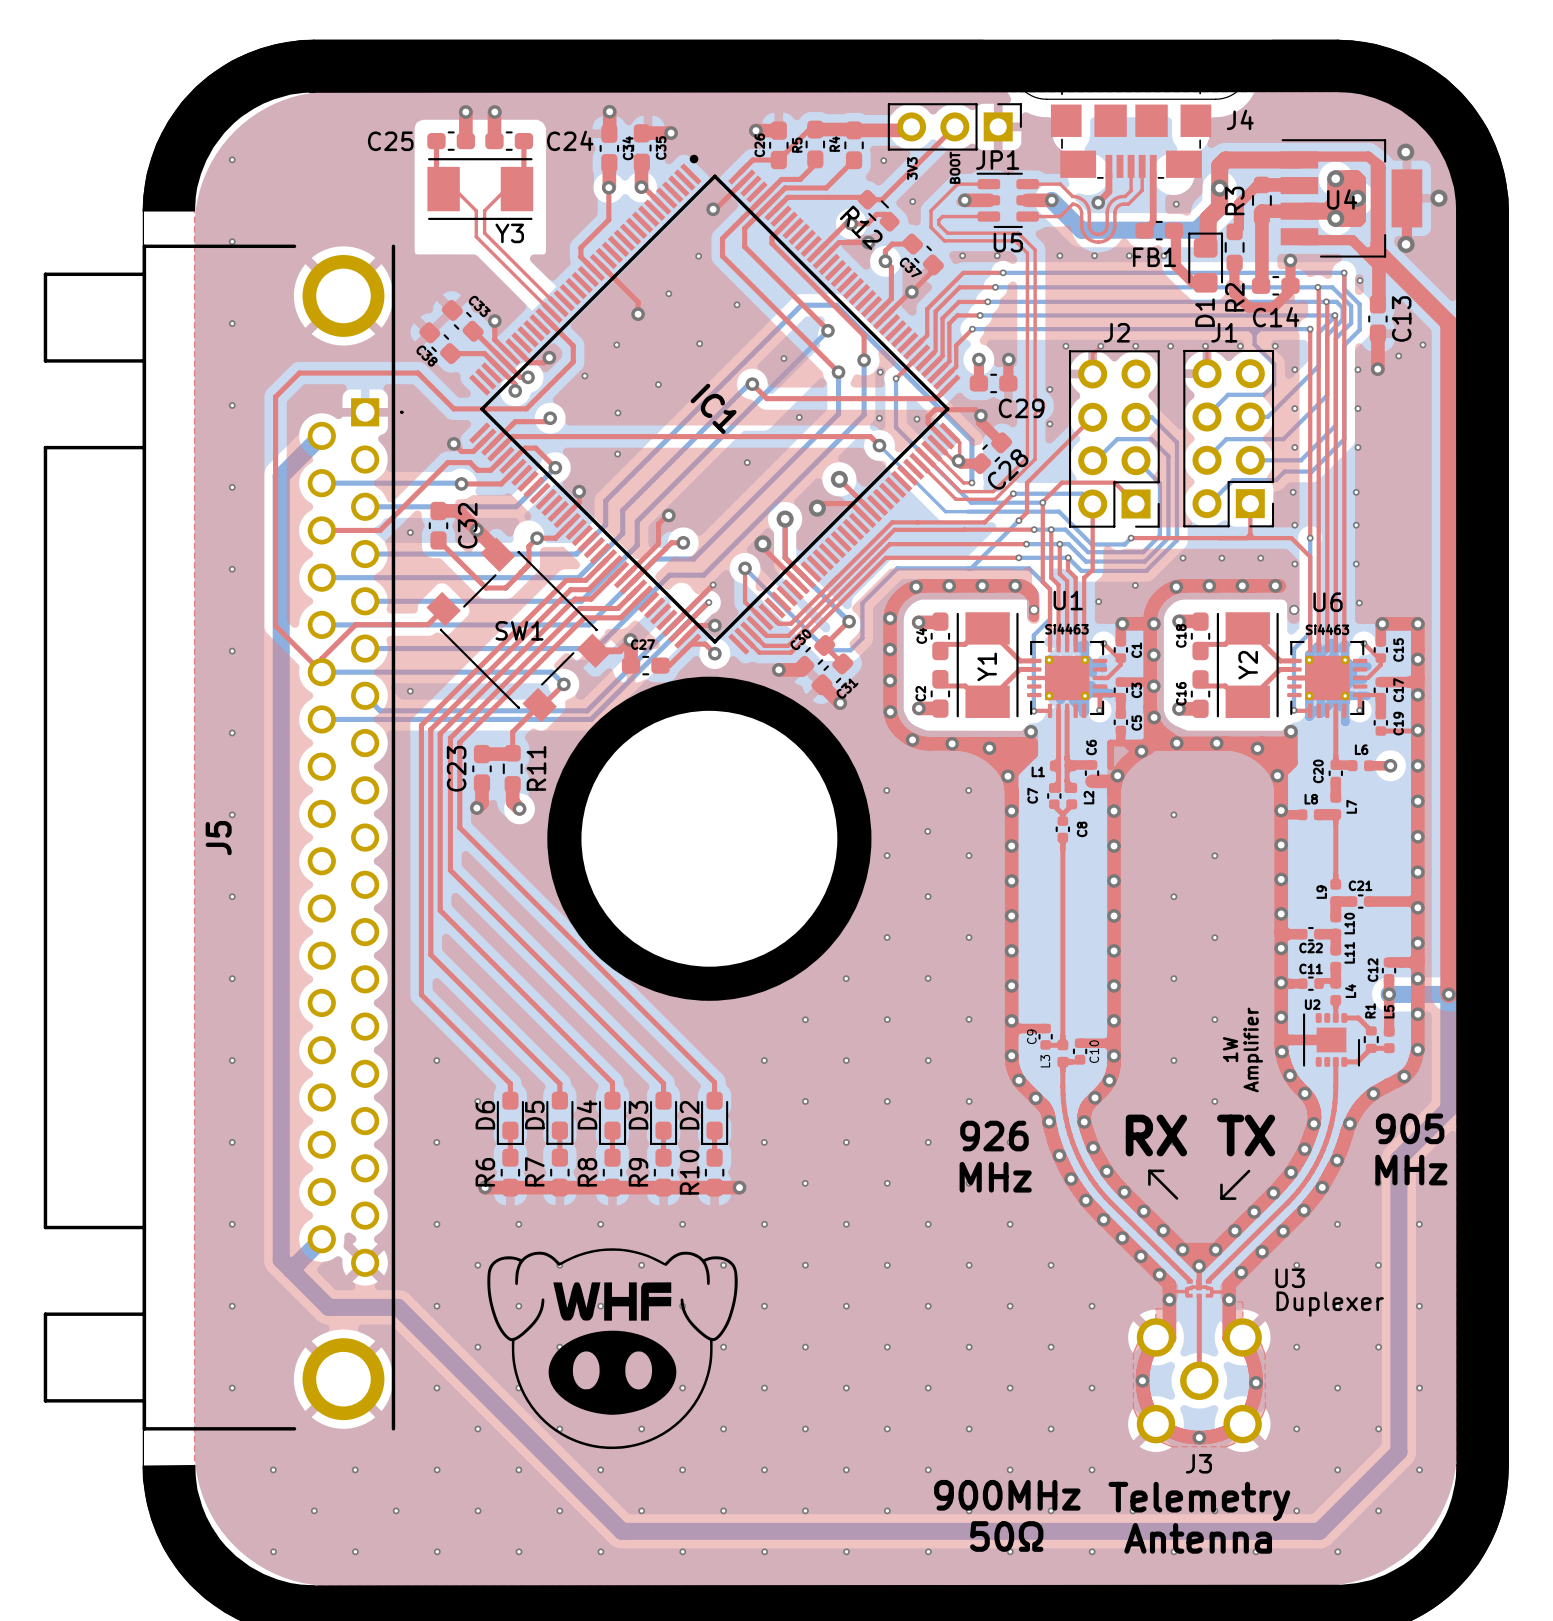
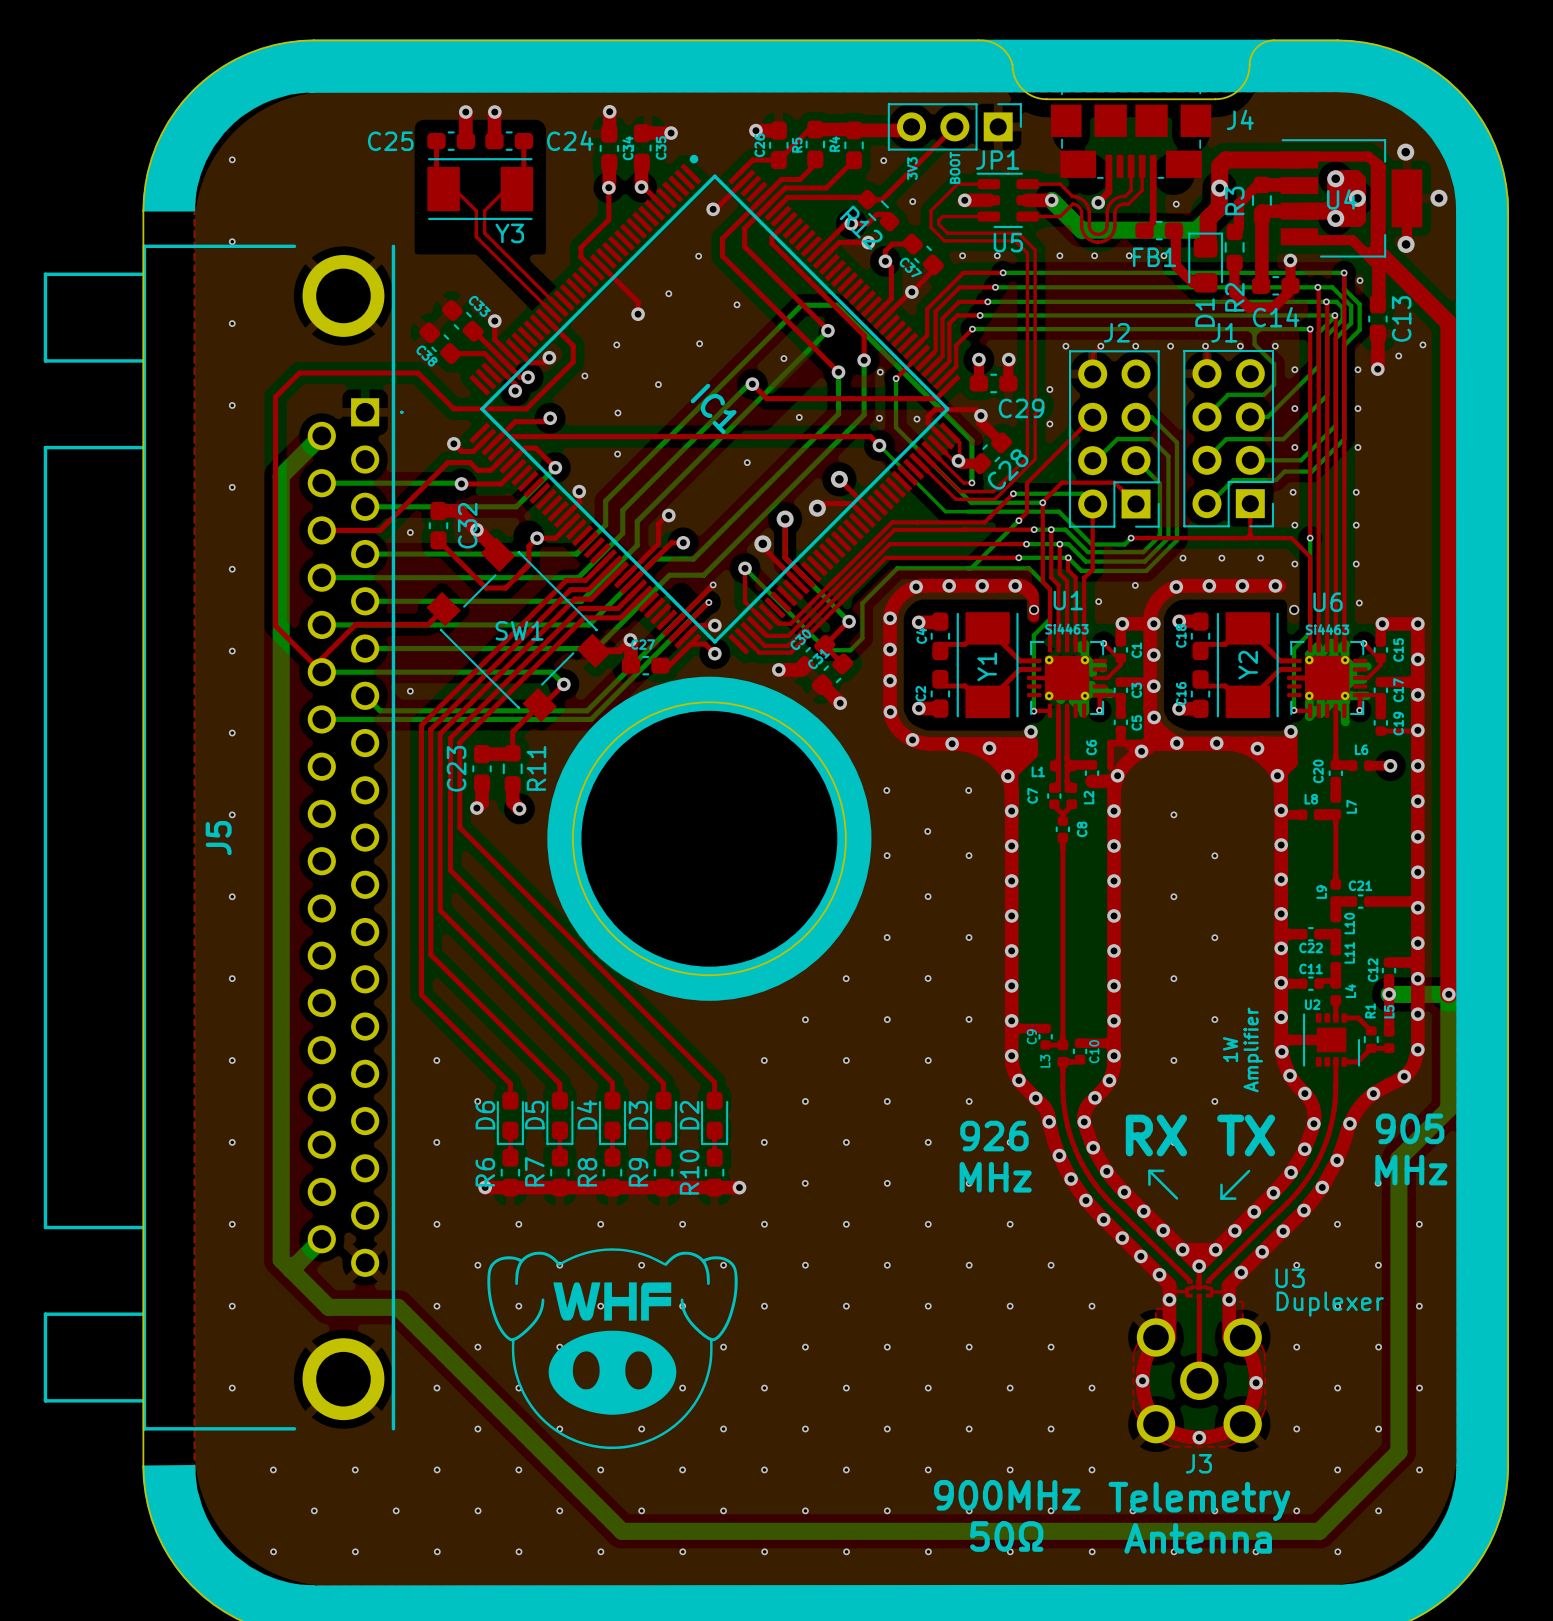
C31 name position: C31 (847, 688) -> C31 (819, 659)

